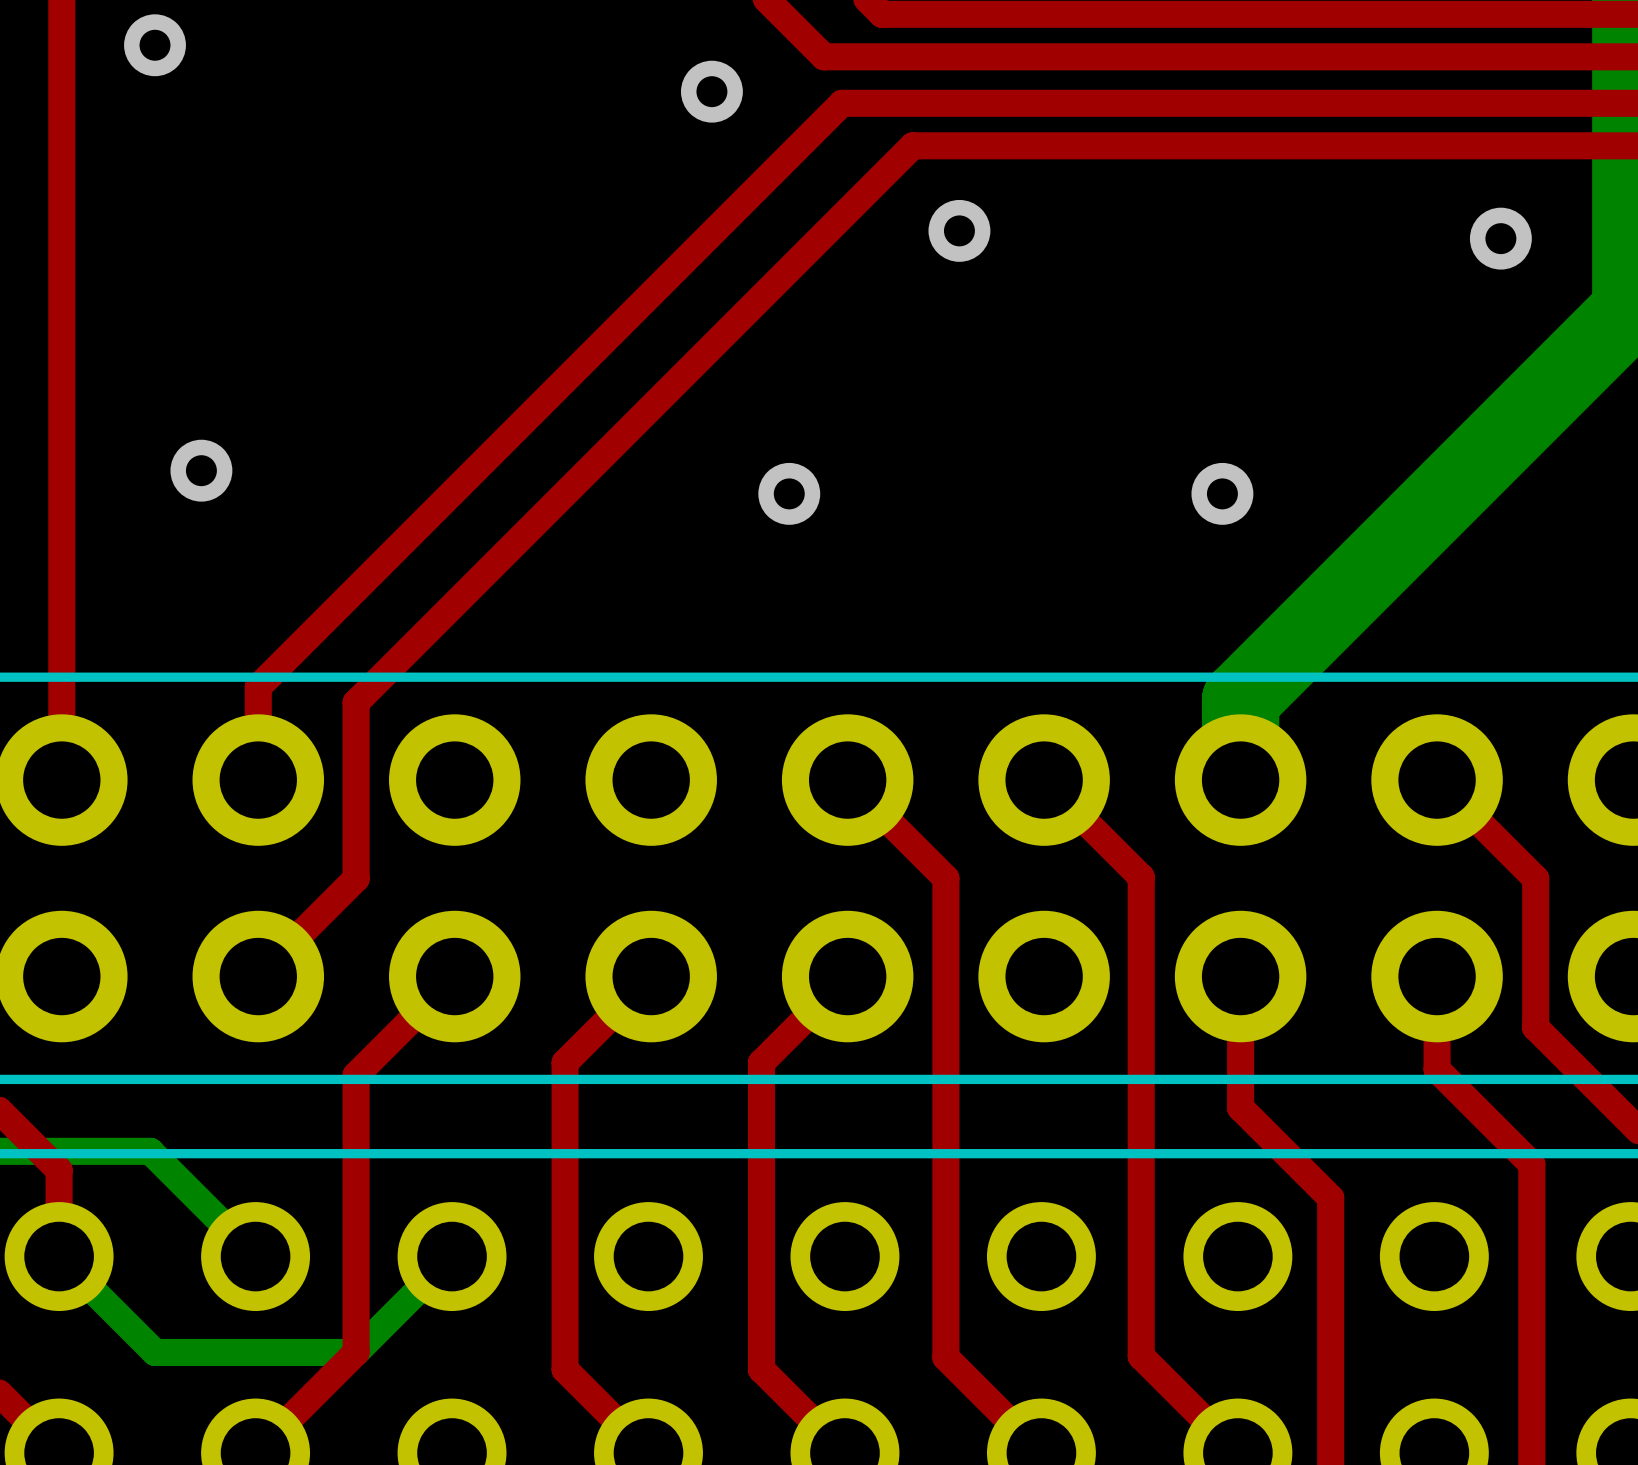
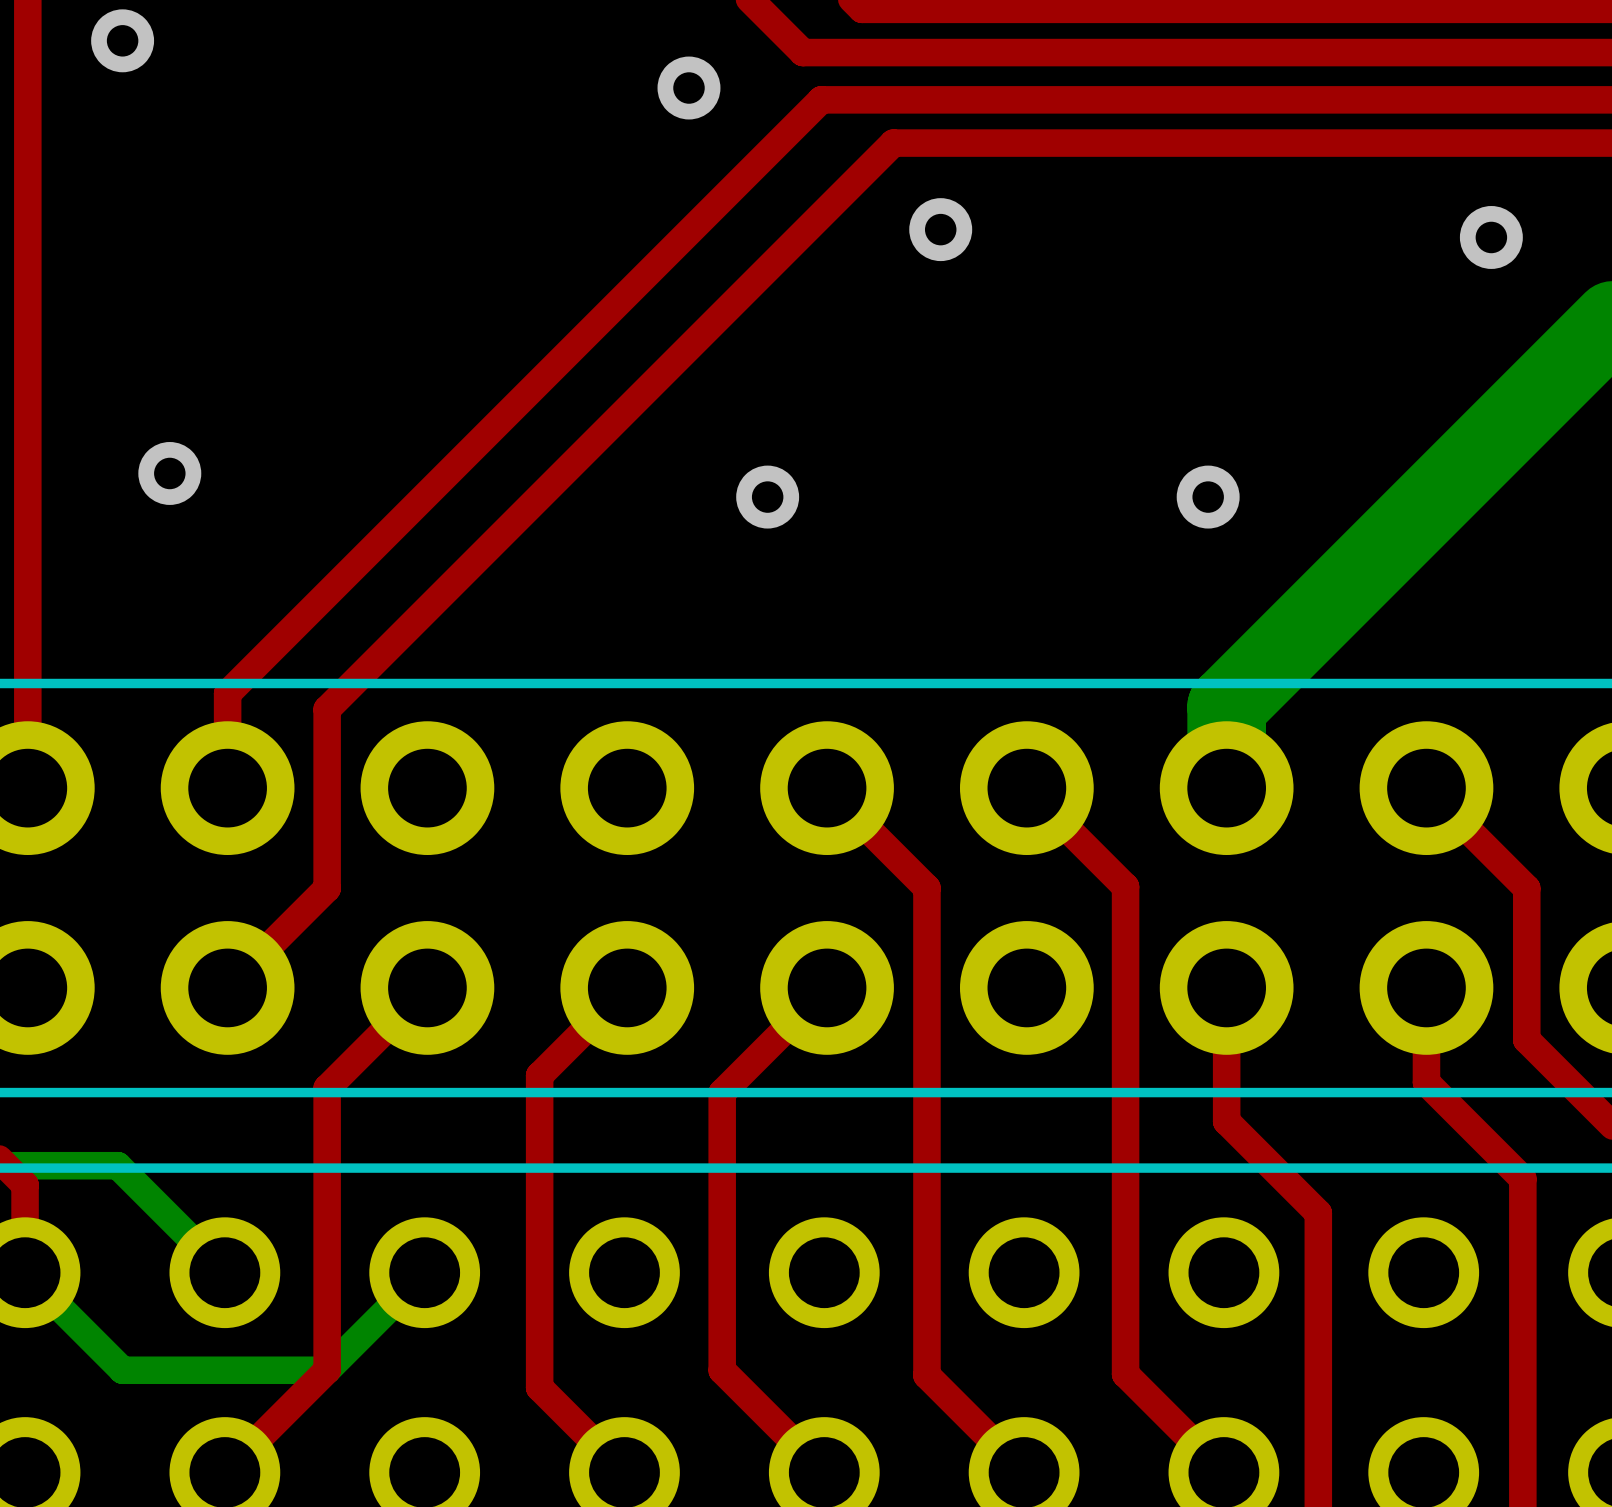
top track: (761, 1062) (761, 1369) -> (739, 1075) (722, 1092) (722, 1370) (739, 1387)

